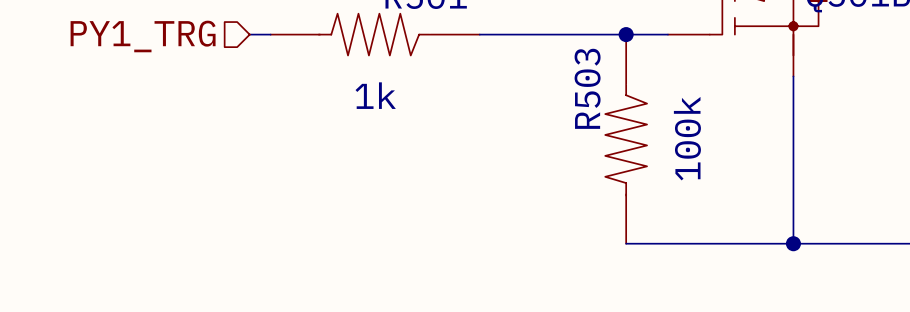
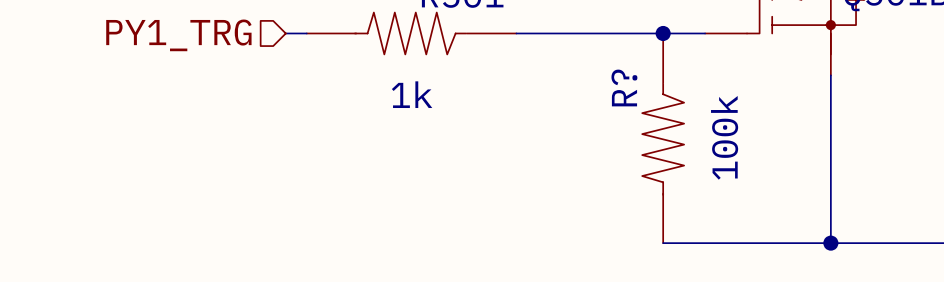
R503 name: R503 (587, 88) -> R? (624, 87)

